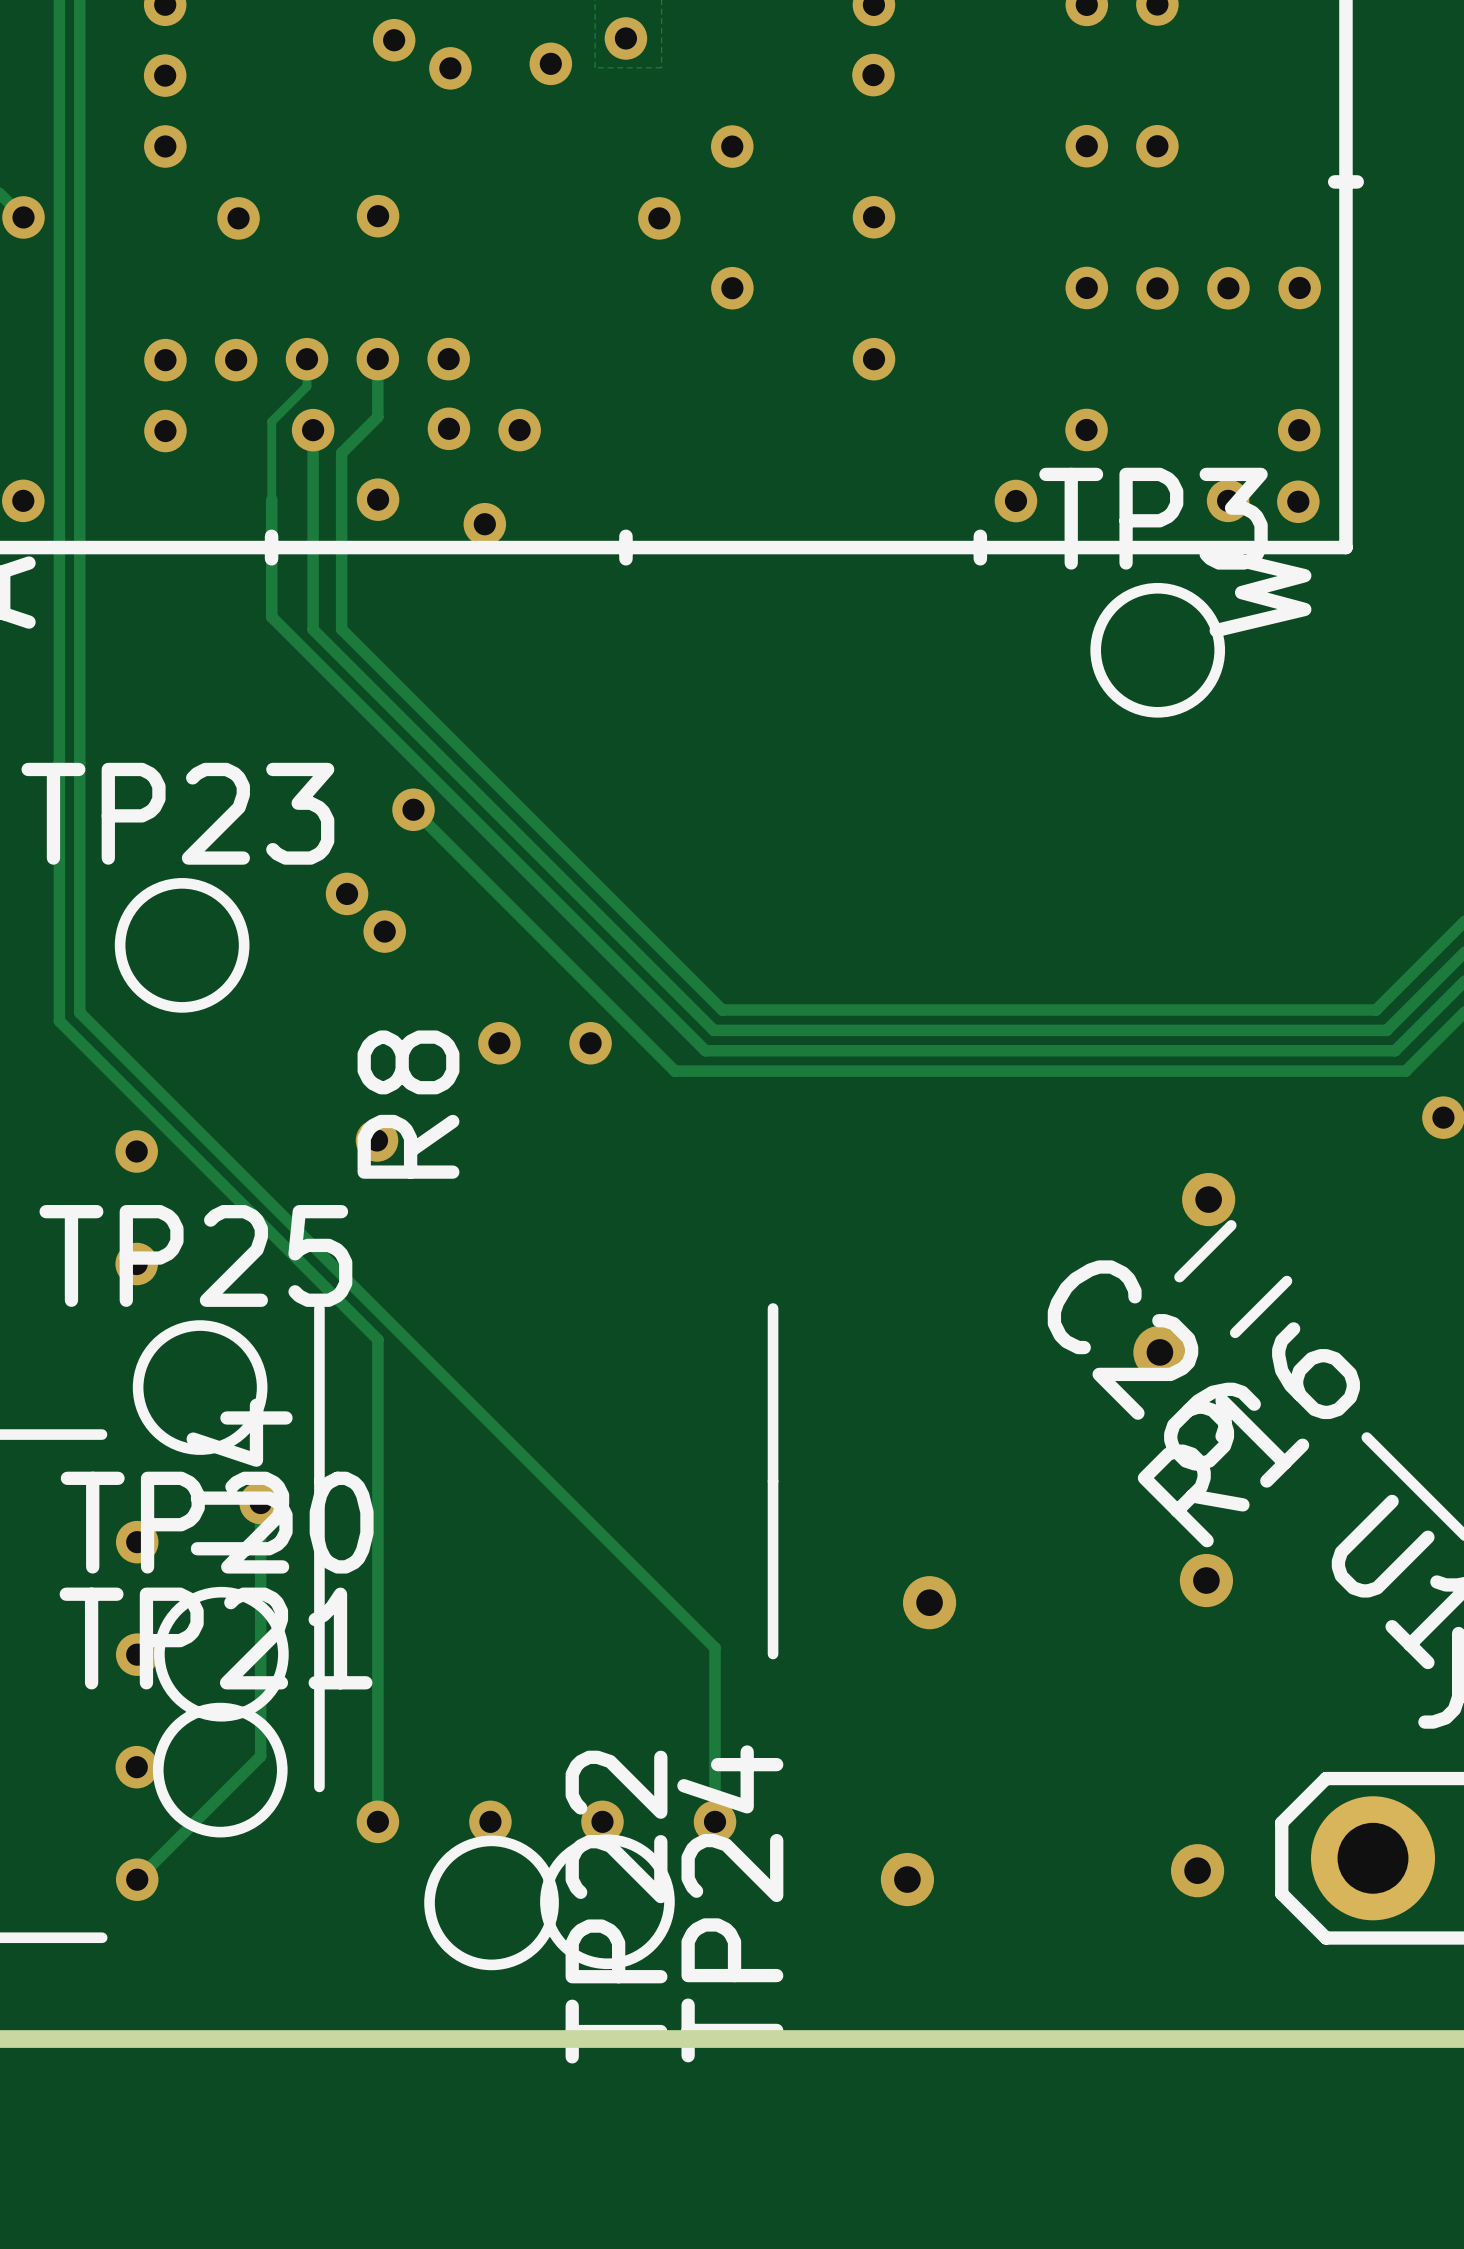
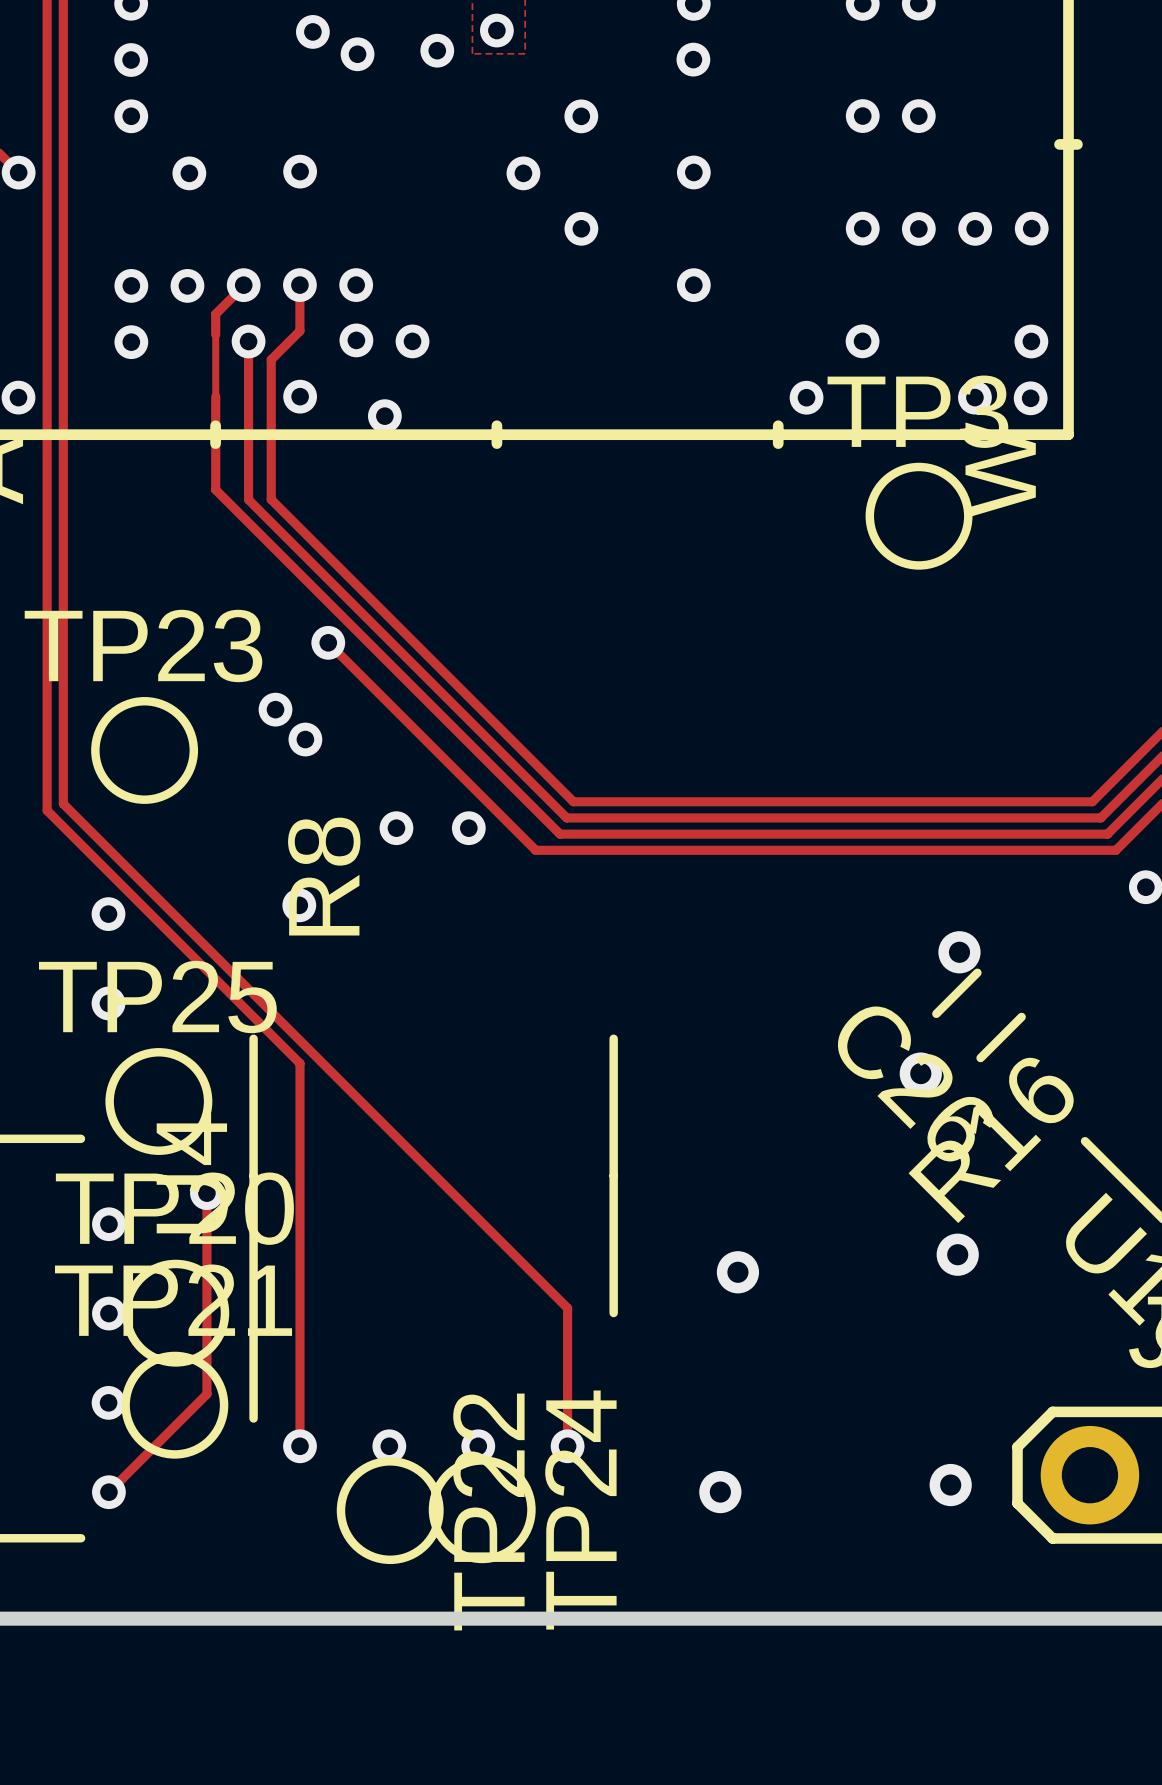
track: (307, 359) (307, 386) (271, 421) -> (243, 286) (215, 314) (215, 334)

